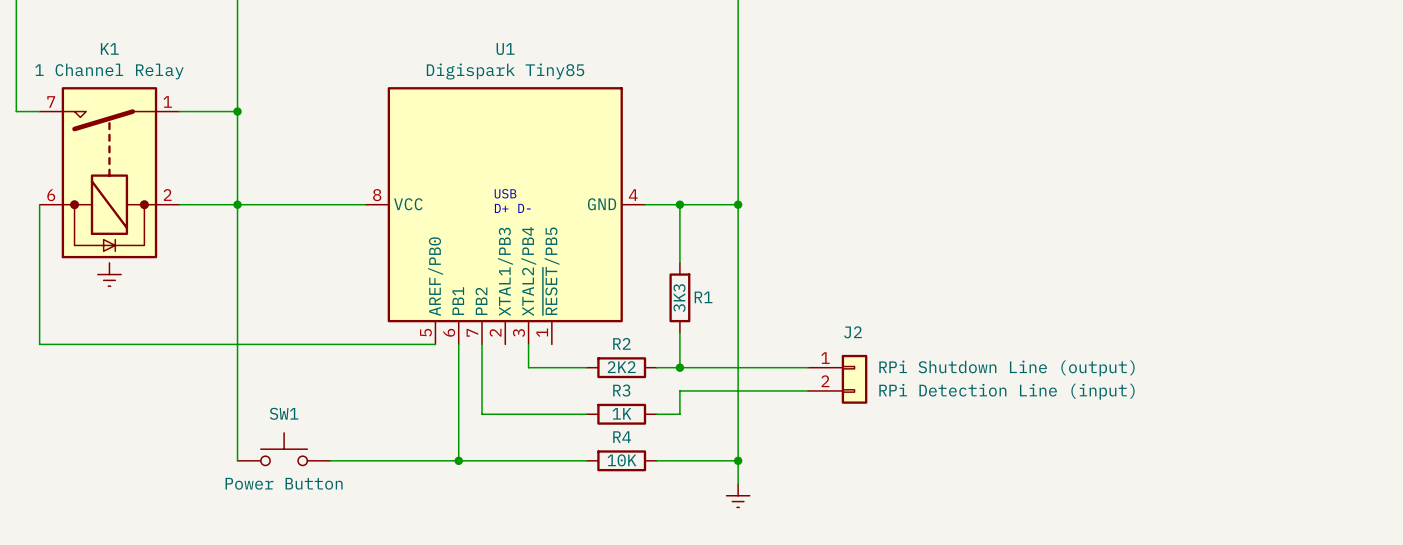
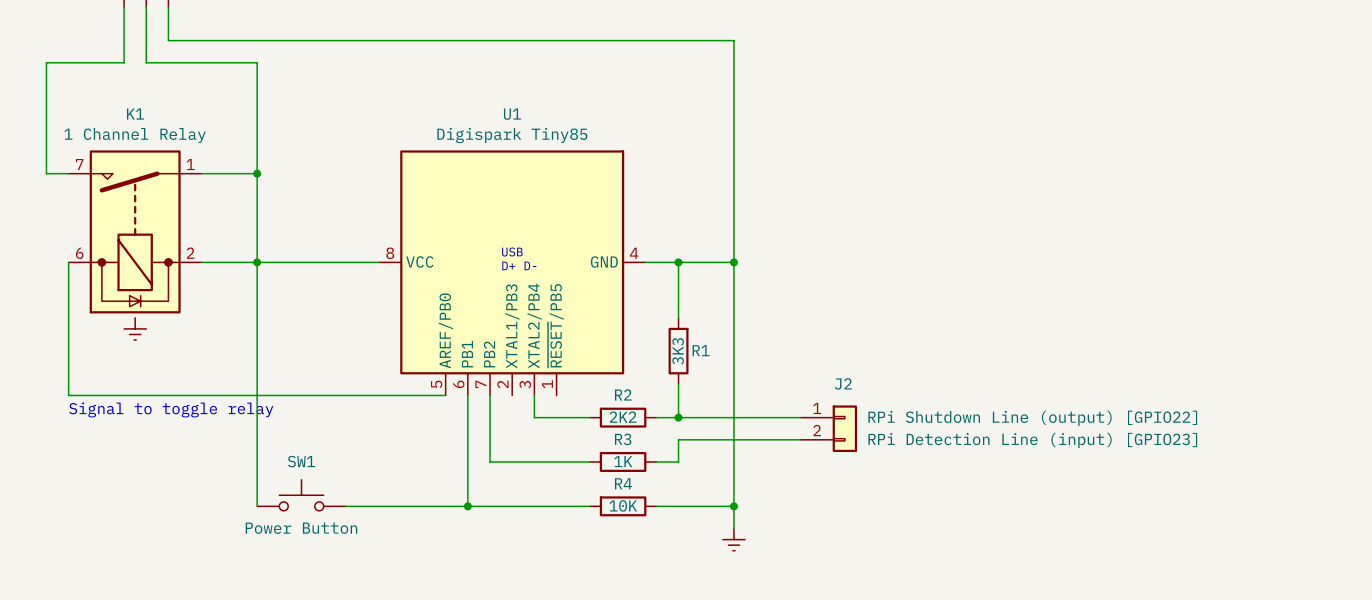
text: none -> Signal to toggle relay (171, 409)
J2 text: RPi Shutdown Line (output) (1006, 368) -> RPi Shutdown Line (output) [GPIO22] (1032, 418)
J2 text: RPi Detection Line (input) (1006, 391) -> RPi Detection Line (input) [GPIO23] (1032, 440)

